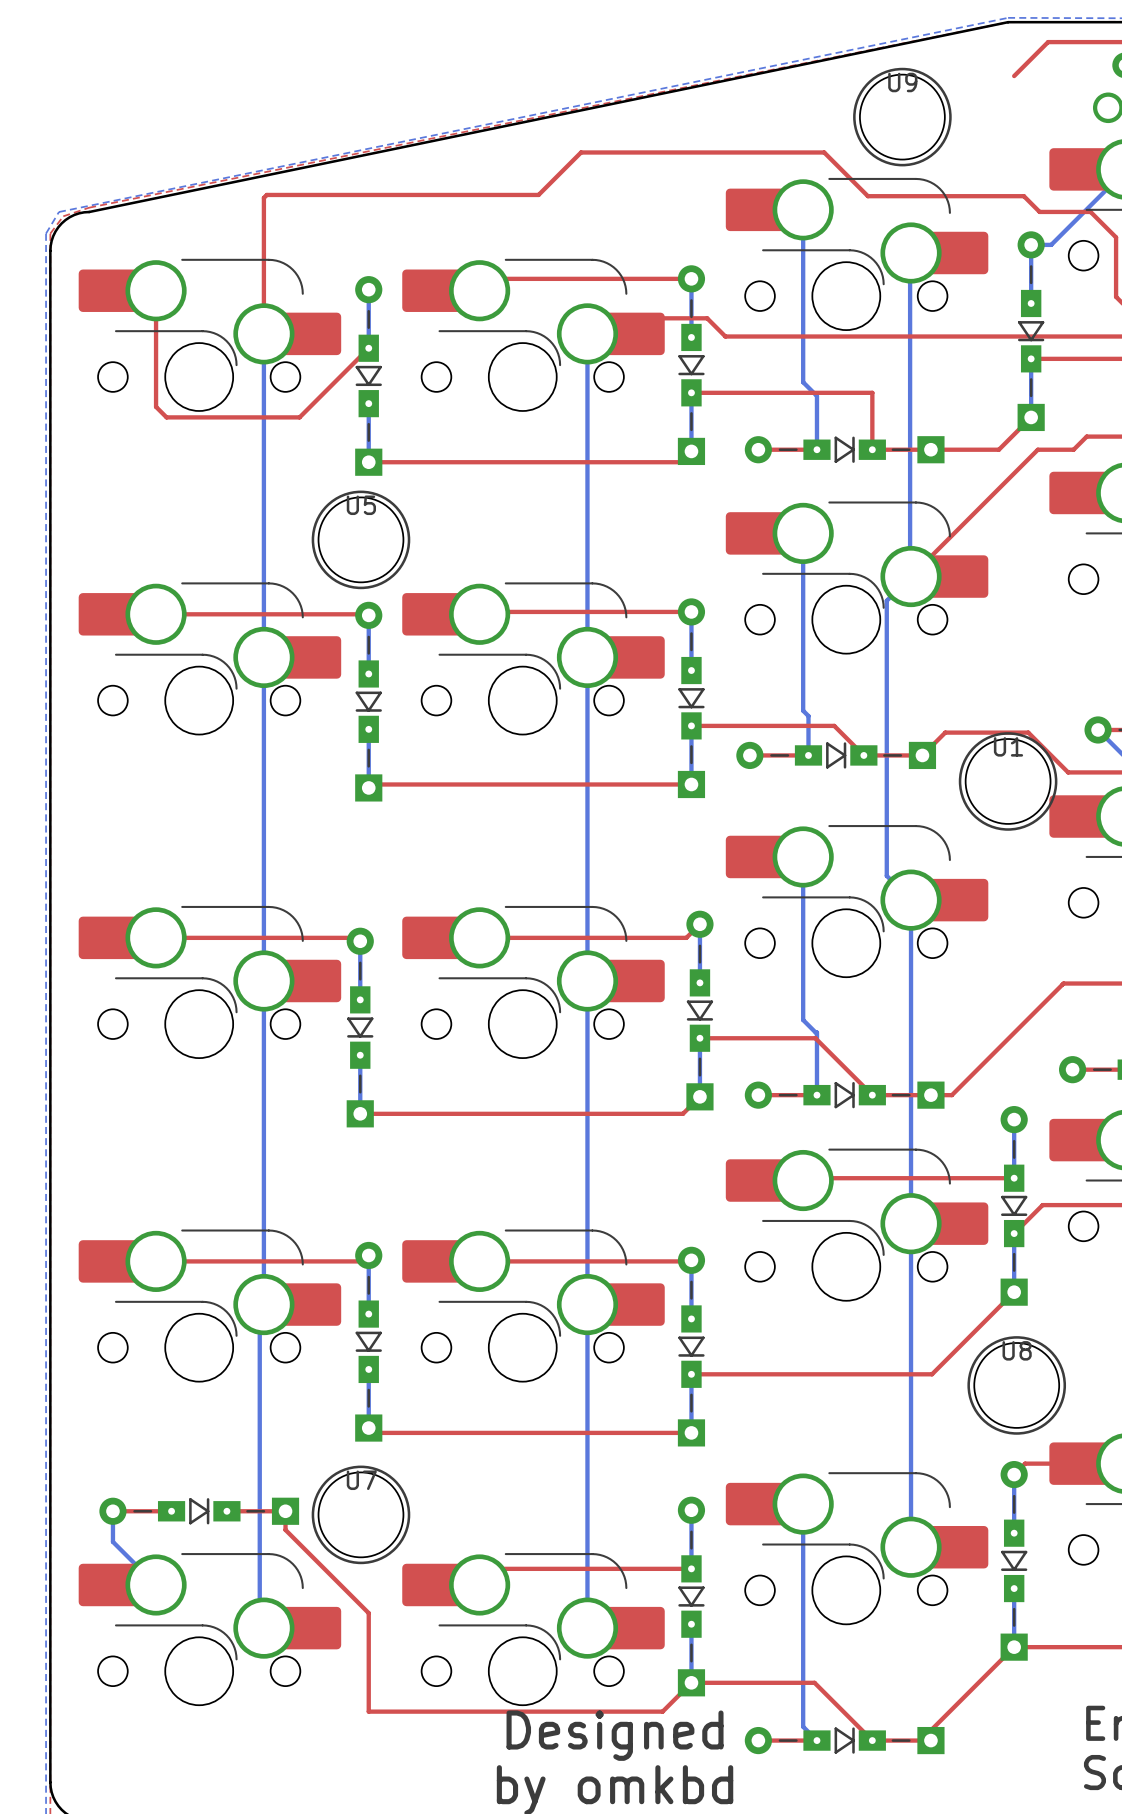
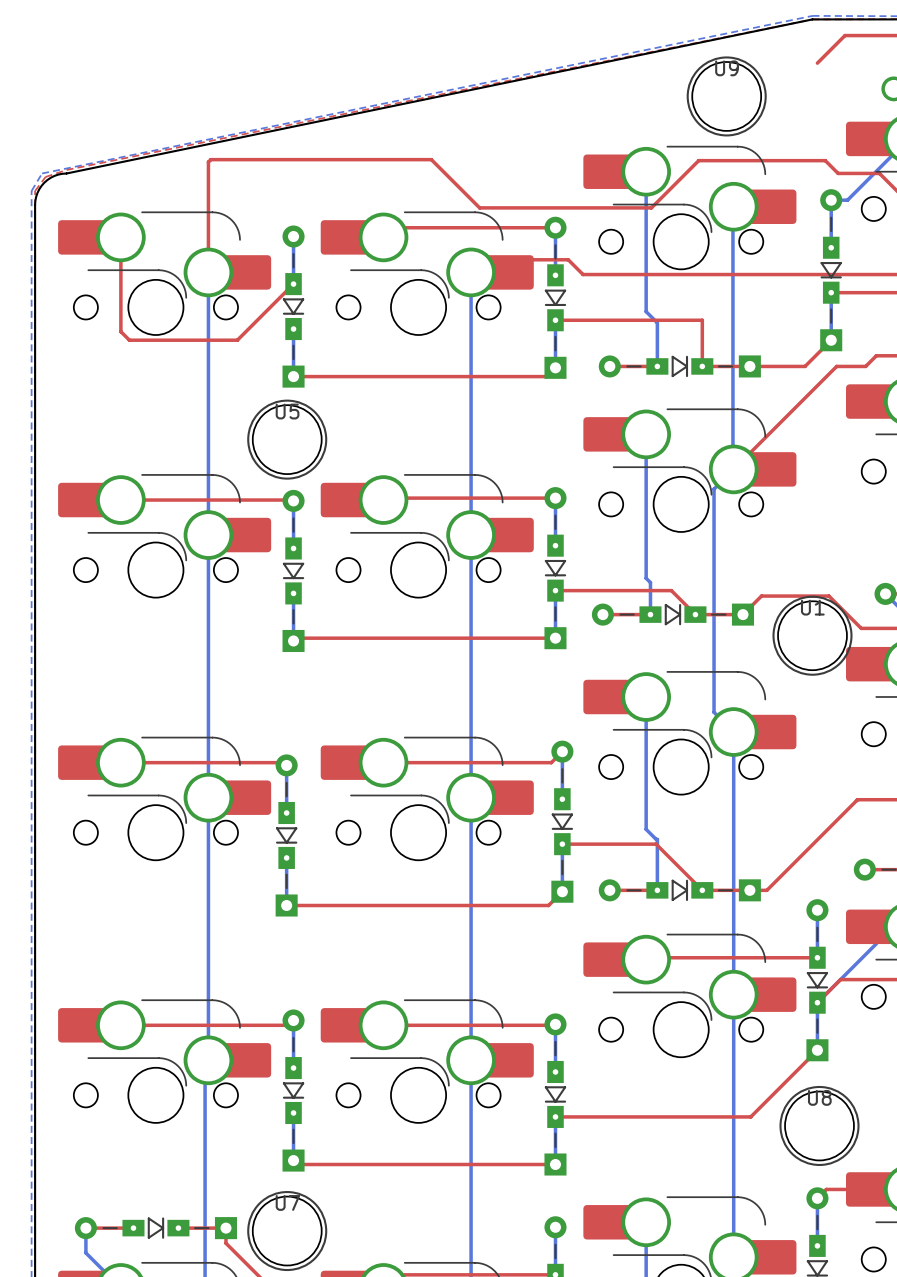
top track: (538, 194) (581, 152) (824, 152) (867, 196) -> (431, 159) (479, 207) (651, 207) (698, 160)
bottom track: none -> (876, 943) (817, 1002)

